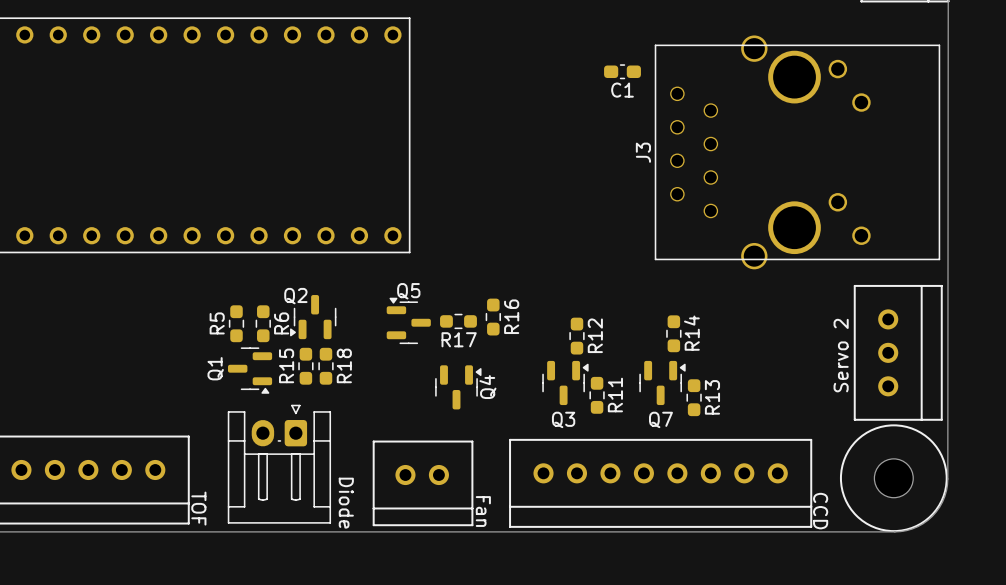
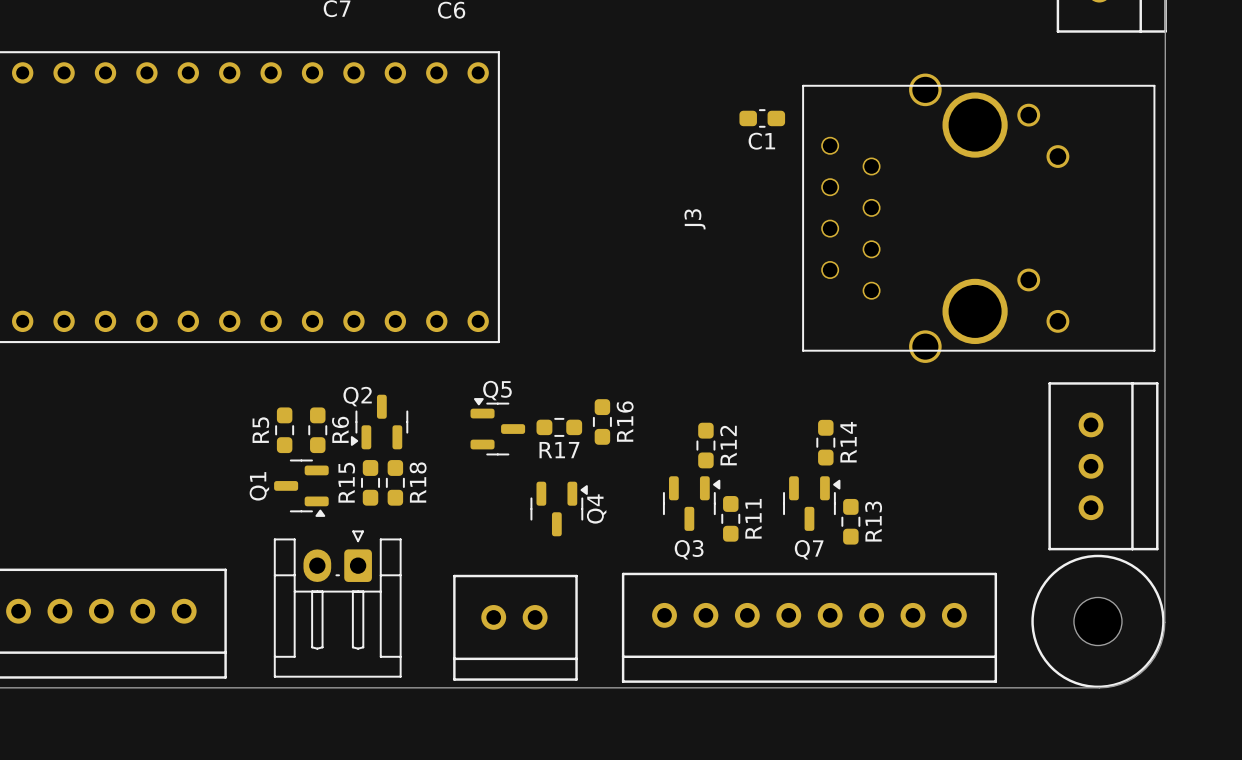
J3 name position: J3 (643, 152) -> J3 (694, 219)
text: Servo 2 (841, 355) -> none
text: Diode (346, 503) -> none
text: TOF (198, 508) -> none
text: Fan (483, 511) -> none
text: CCD (820, 511) -> none

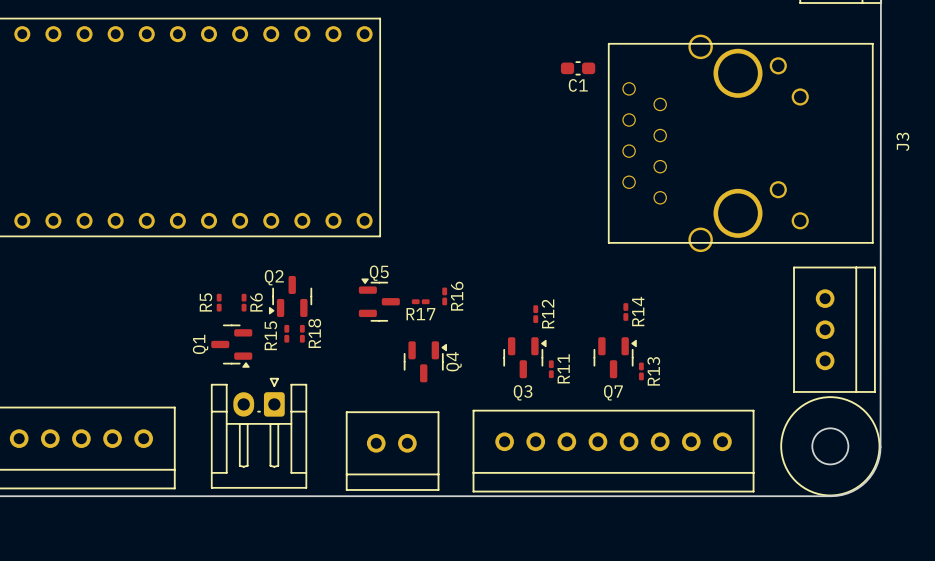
J3 name position: J3 (694, 219) -> J3 (902, 141)
R16 footprint: [592, 399, 612, 445] -> [442, 287, 448, 306]
R5 footprint: [275, 407, 295, 454] -> [216, 293, 222, 312]
R6 footprint: [308, 407, 328, 454] -> [241, 293, 247, 312]
R17 footprint: [536, 417, 583, 437] -> [411, 299, 430, 305]
R14 footprint: [816, 419, 836, 466] -> [623, 303, 629, 321]
R12 footprint: [696, 422, 716, 469] -> [533, 305, 539, 324]
R15 footprint: [361, 460, 381, 506] -> [284, 324, 290, 343]
R18 footprint: [385, 460, 405, 506] -> [299, 324, 305, 343]
R11 footprint: [721, 496, 741, 542] -> [548, 360, 554, 379]
R13 footprint: [841, 498, 861, 545] -> [638, 362, 644, 381]

